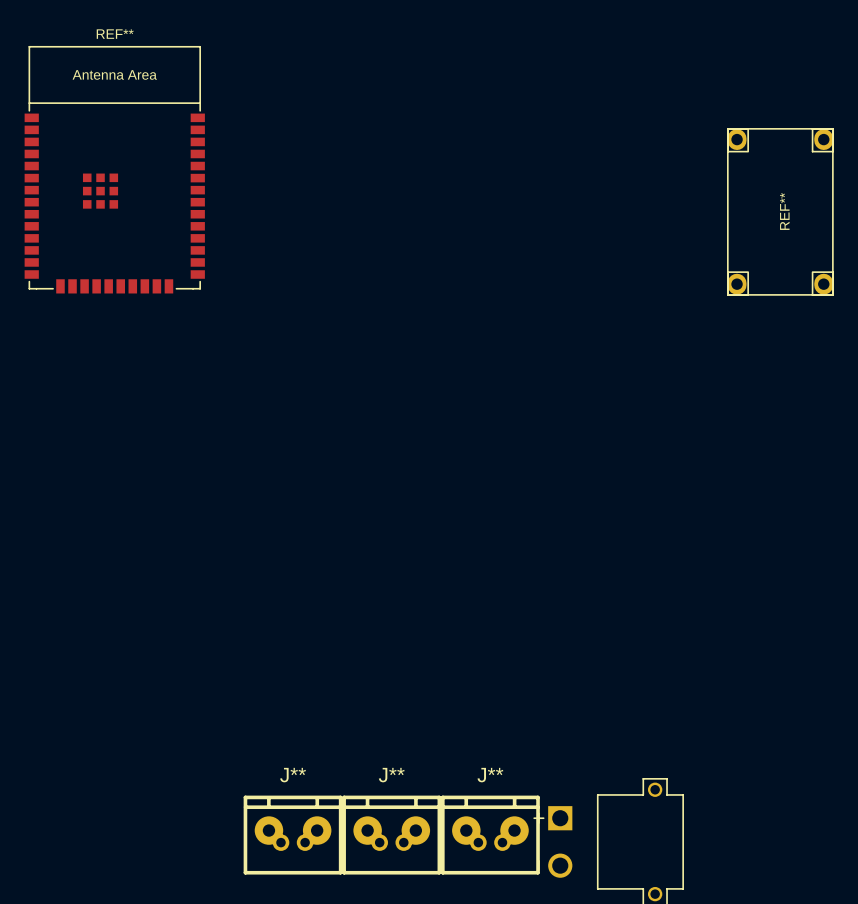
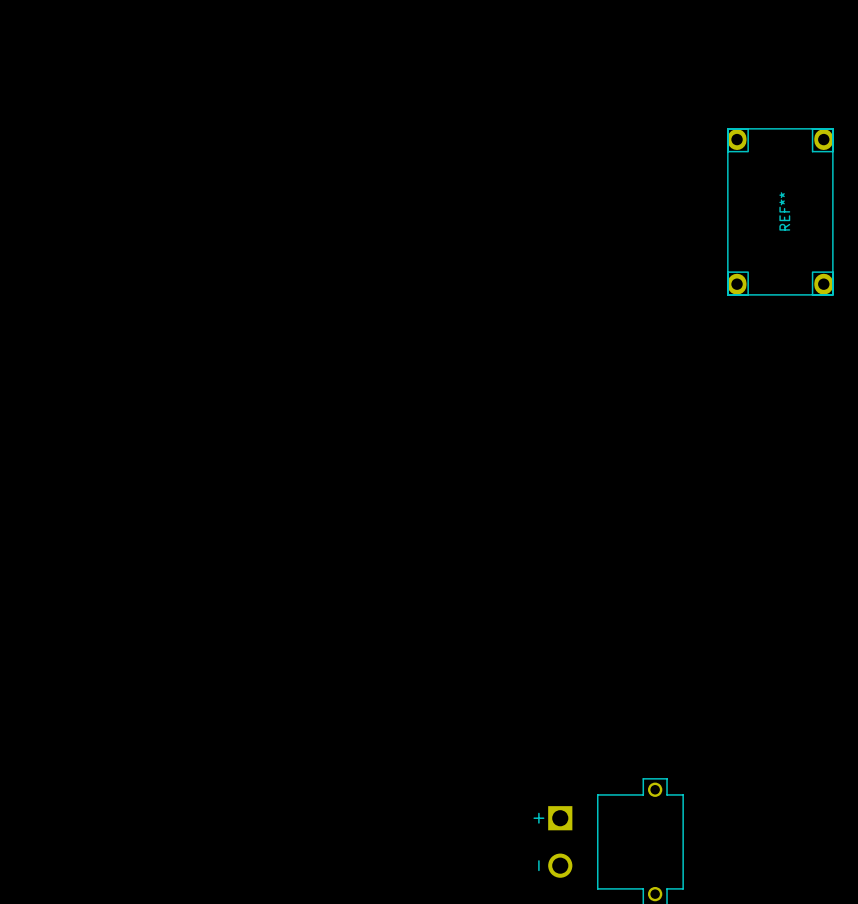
REF**: (114, 169) -> none
part: J** (293, 835) -> none
part: J** (391, 835) -> none
part: J** (490, 835) -> none

